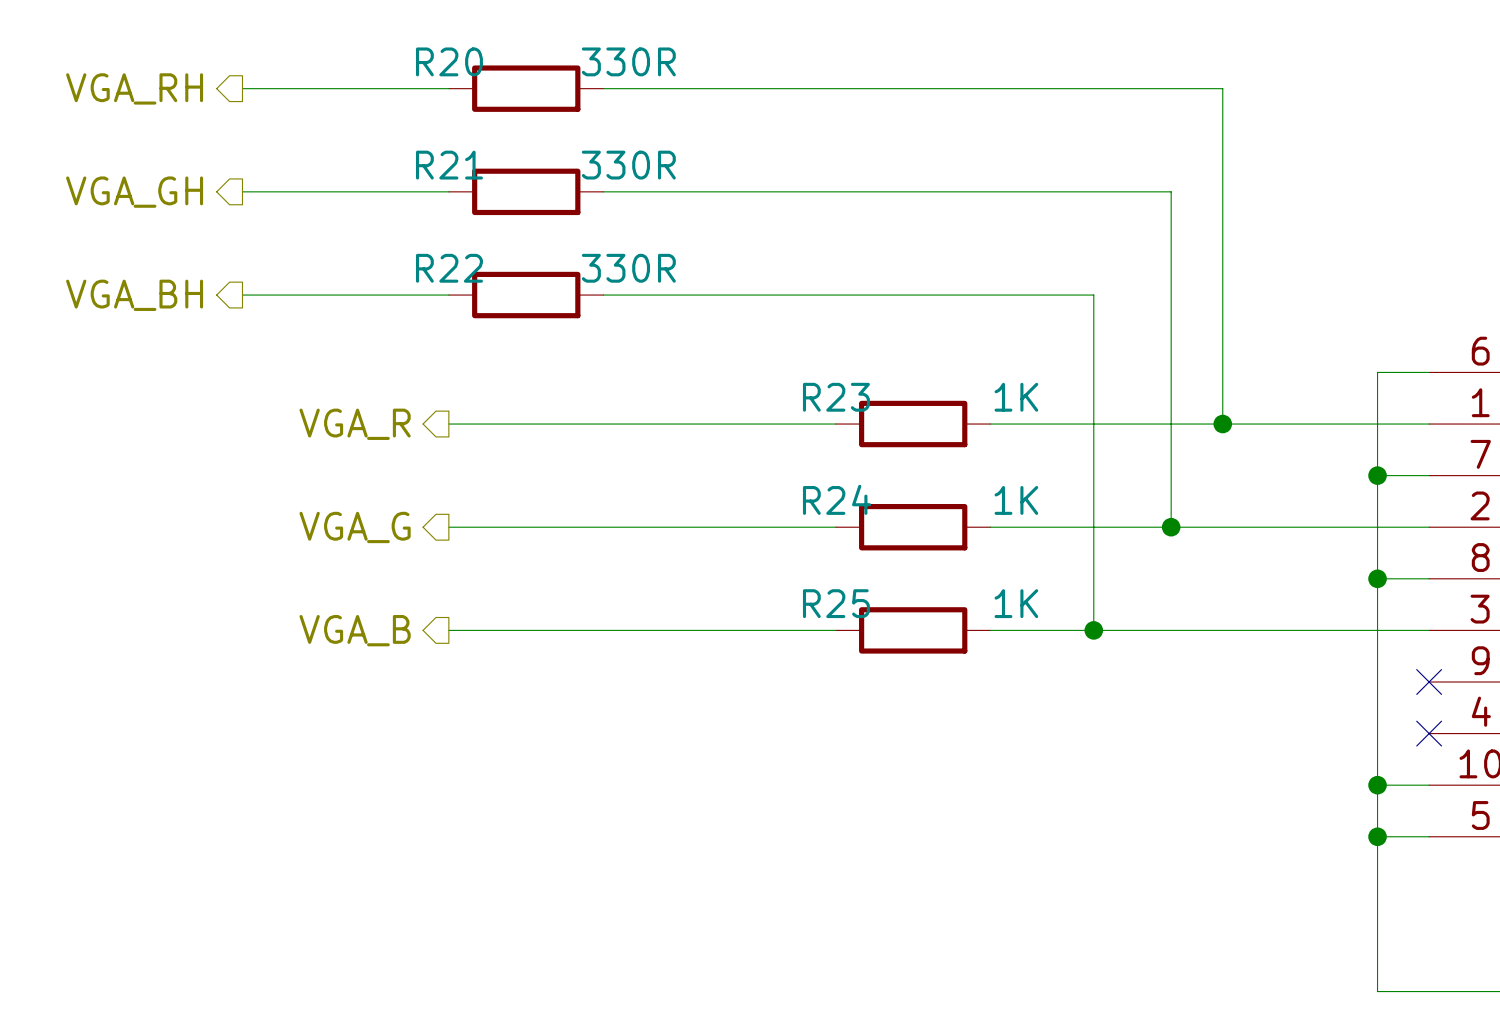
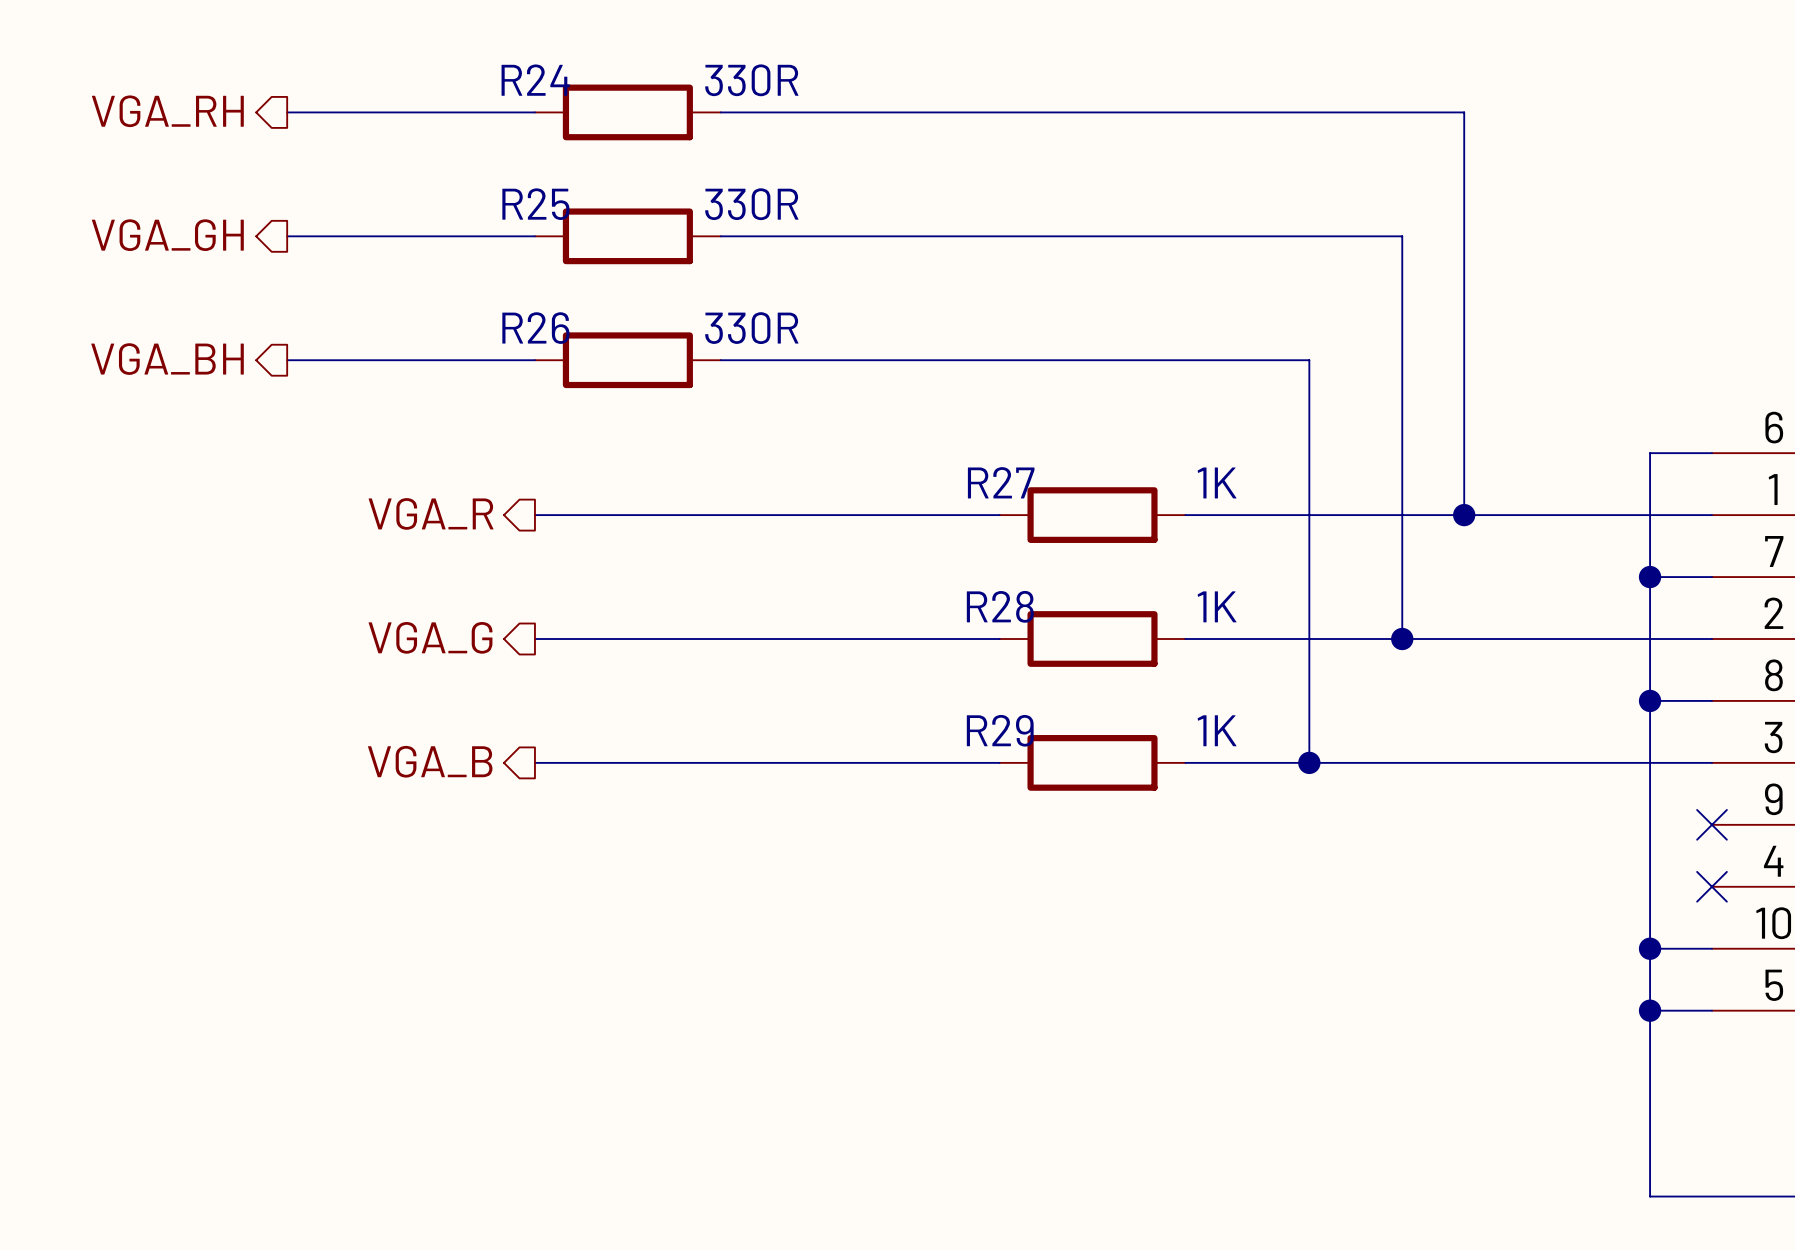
R20 name: R20 (449, 61) -> R24 (535, 80)
R21 name: R21 (449, 165) -> R25 (535, 204)
R22 name: R22 (449, 268) -> R26 (535, 328)
R23 name: R23 (836, 397) -> R27 (1001, 482)
R24 name: R24 (837, 499) -> R28 (1000, 606)
R25 name: R25 (836, 603) -> R29 (1000, 730)

